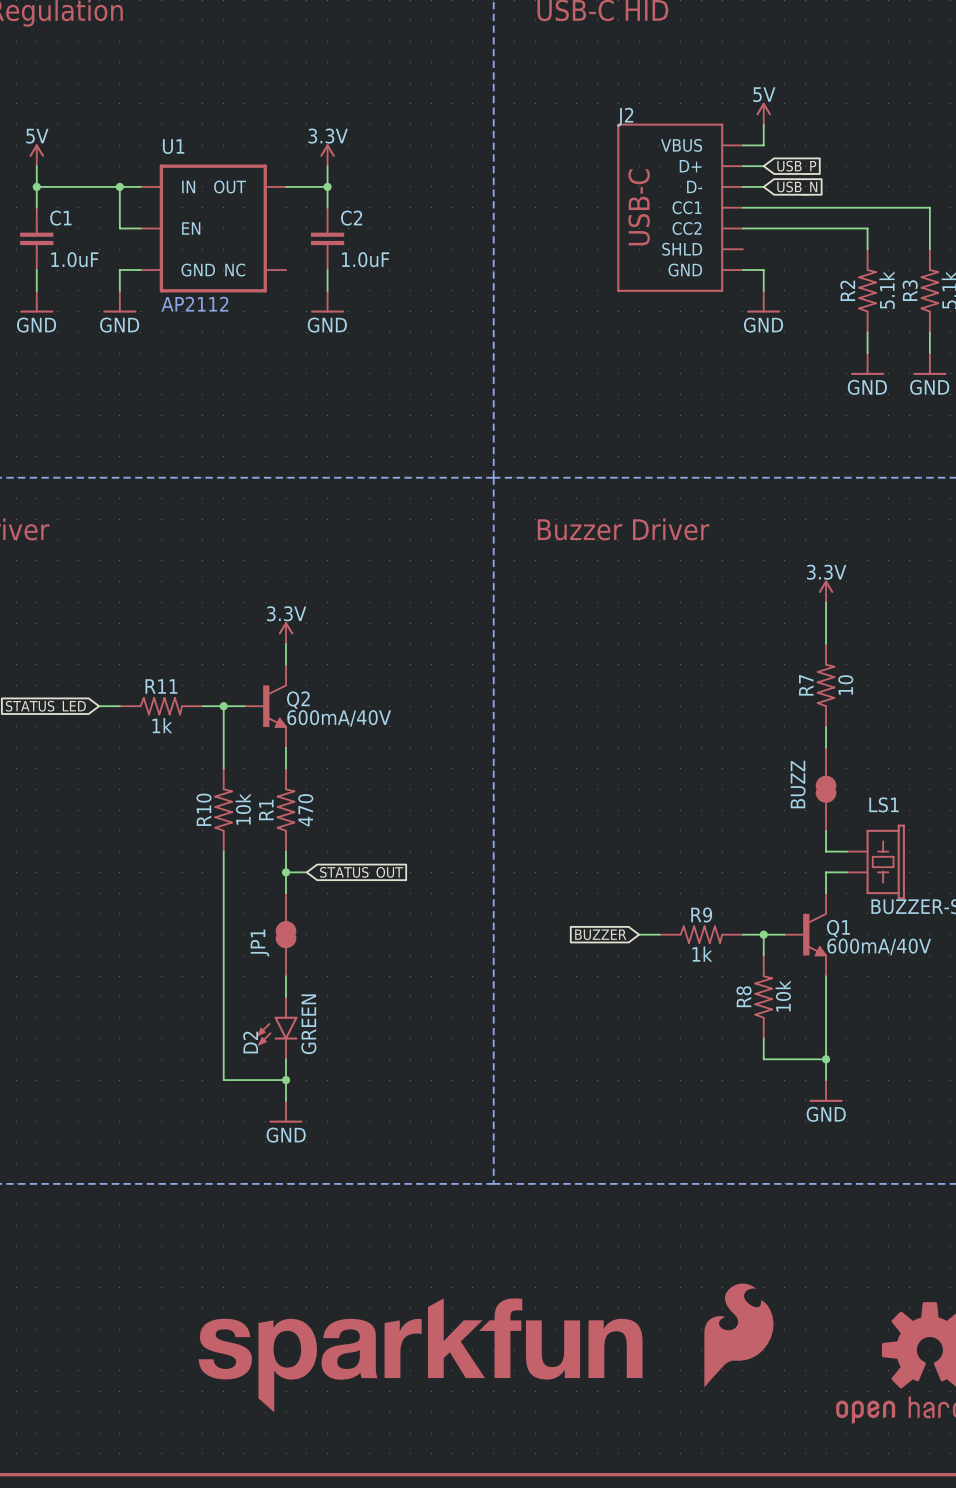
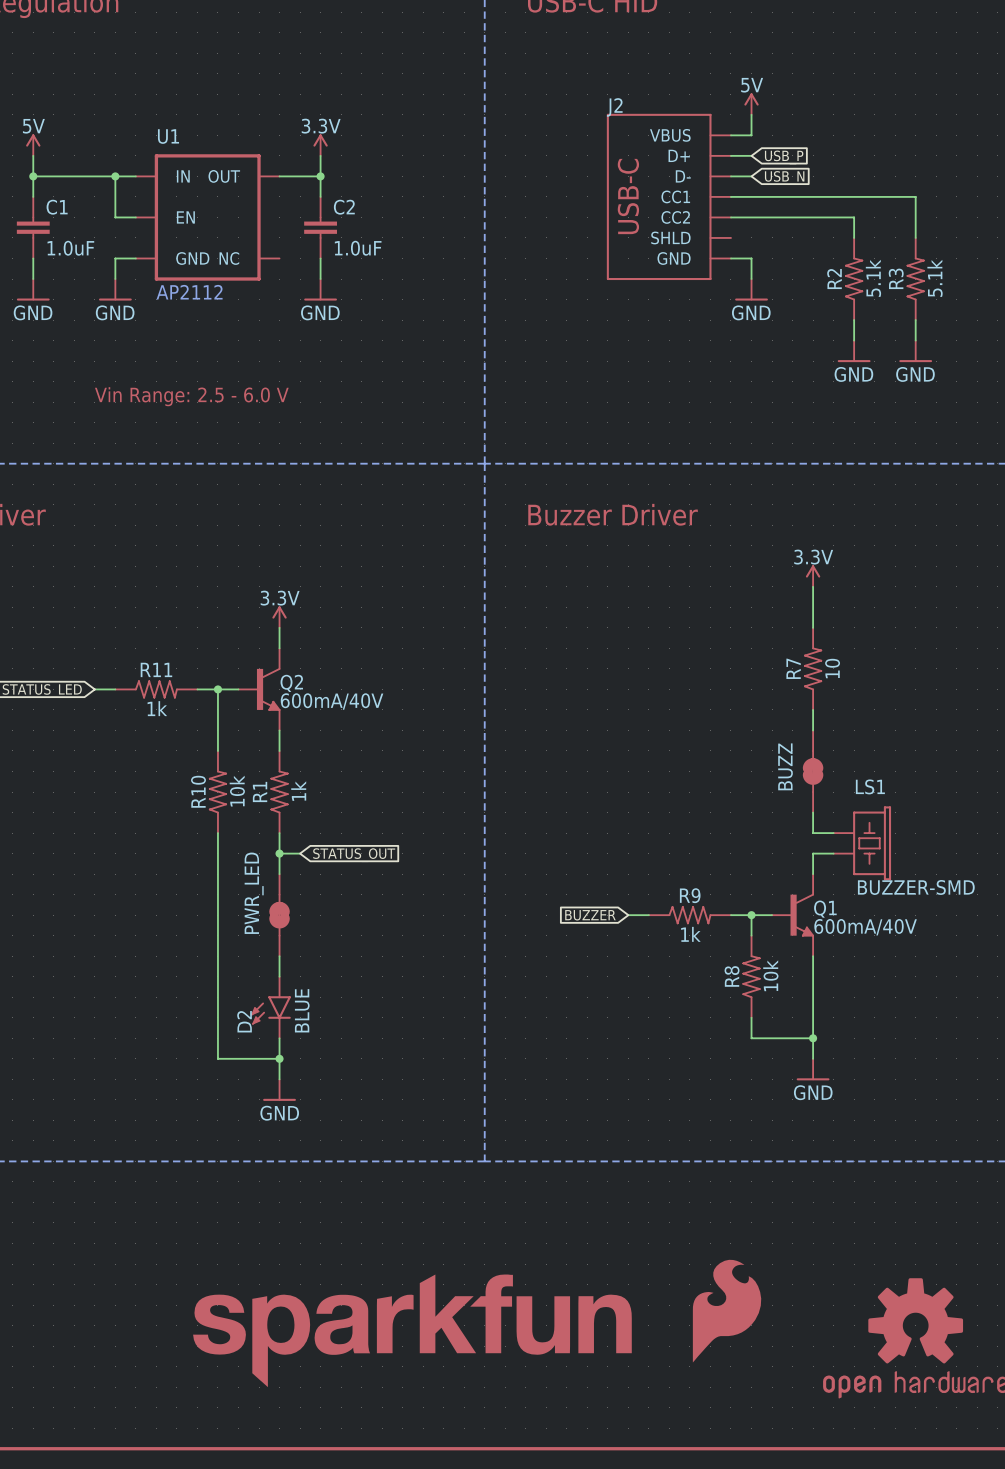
text: none -> Vin Range: 2.5 - 6.0 V (191, 396)
R1 value: 470 (305, 810) -> 1k (298, 791)
JP1 name: JP1 (259, 942) -> PWR_LED (254, 893)
D2 value: GREEN (308, 1024) -> BLUE (302, 1010)

